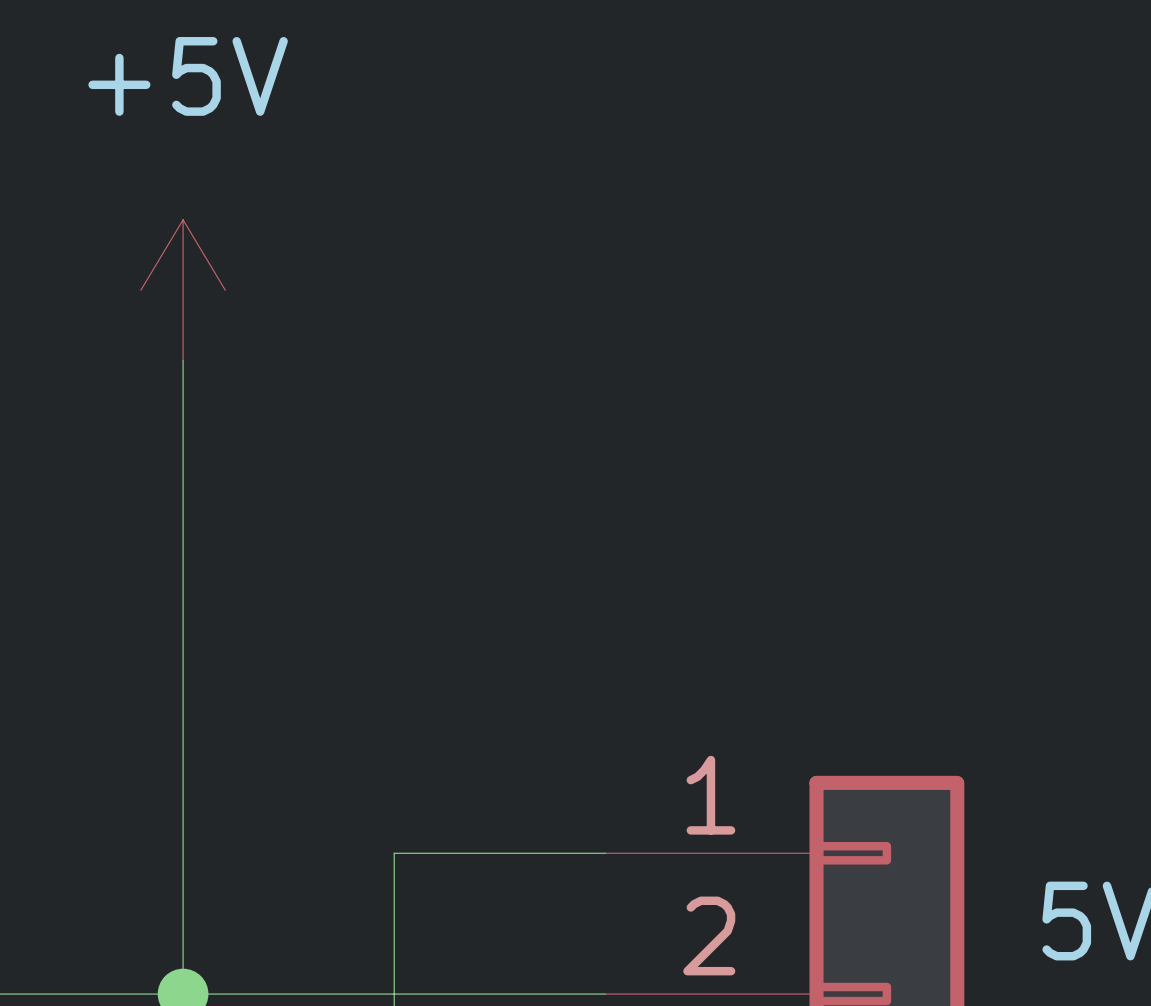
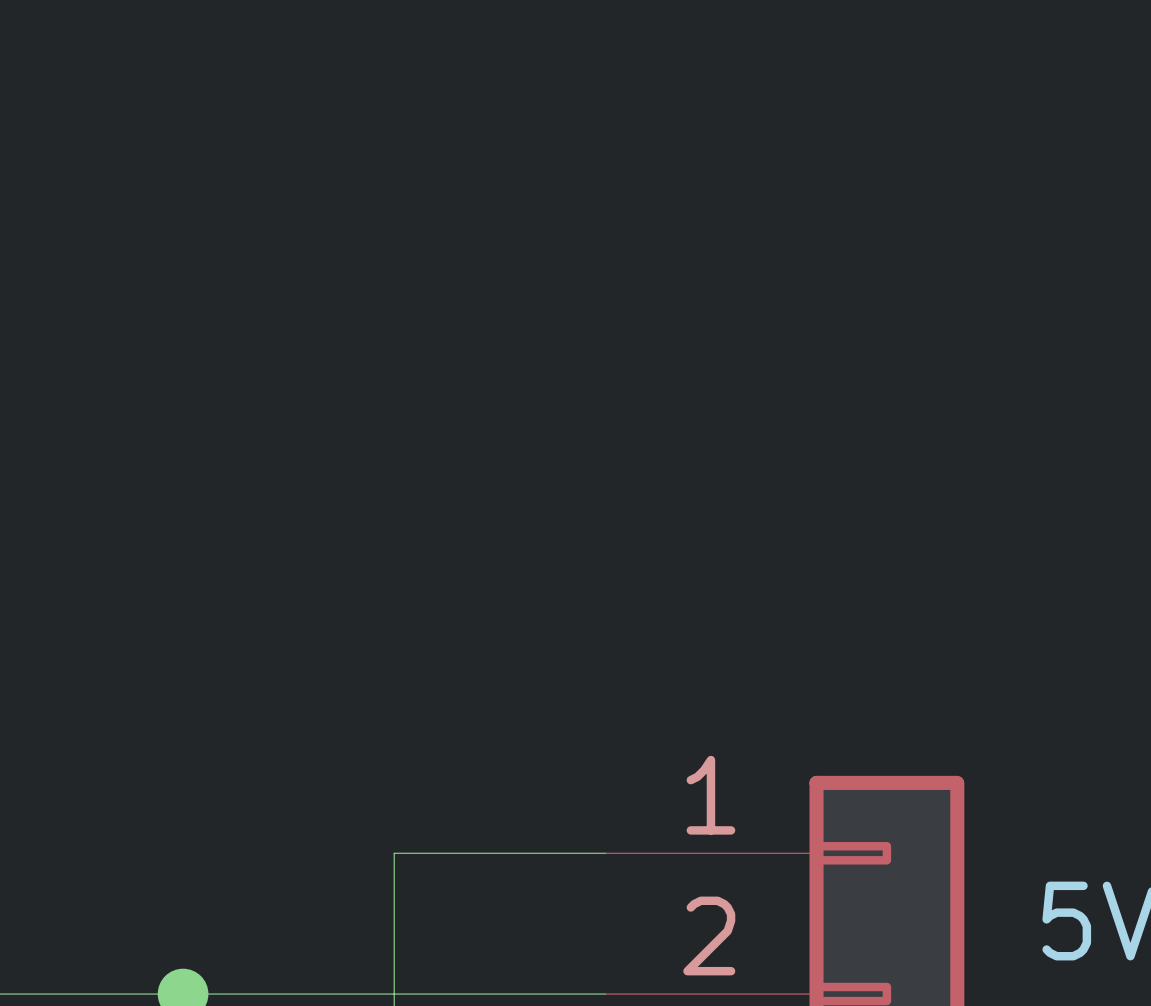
power symbol: +5V (183, 290) -> none
wire: (183, 360) (183, 994) -> none

